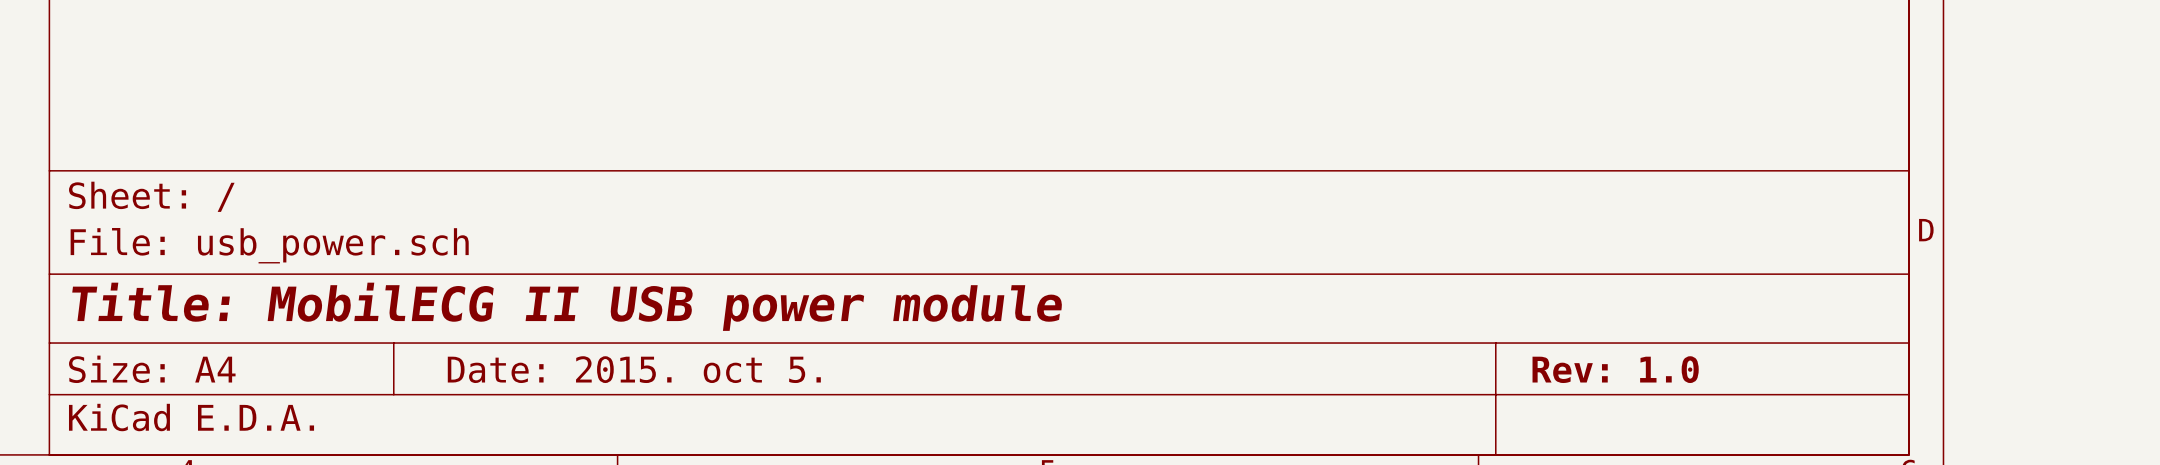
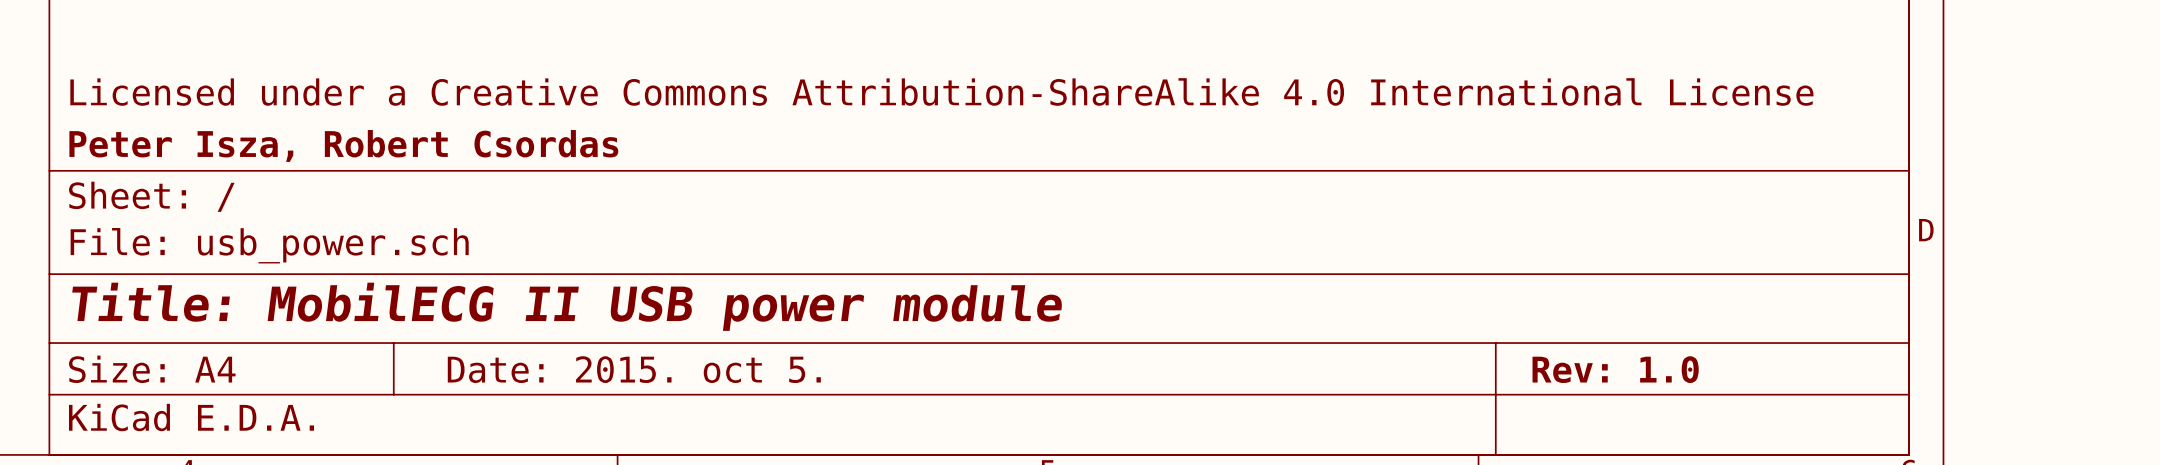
title block: none -> Licensed under a Creative Commons Attribution-ShareAlike 4.0 International License (941, 91)
title block: none -> Peter Isza, Robert Csordas (343, 145)

